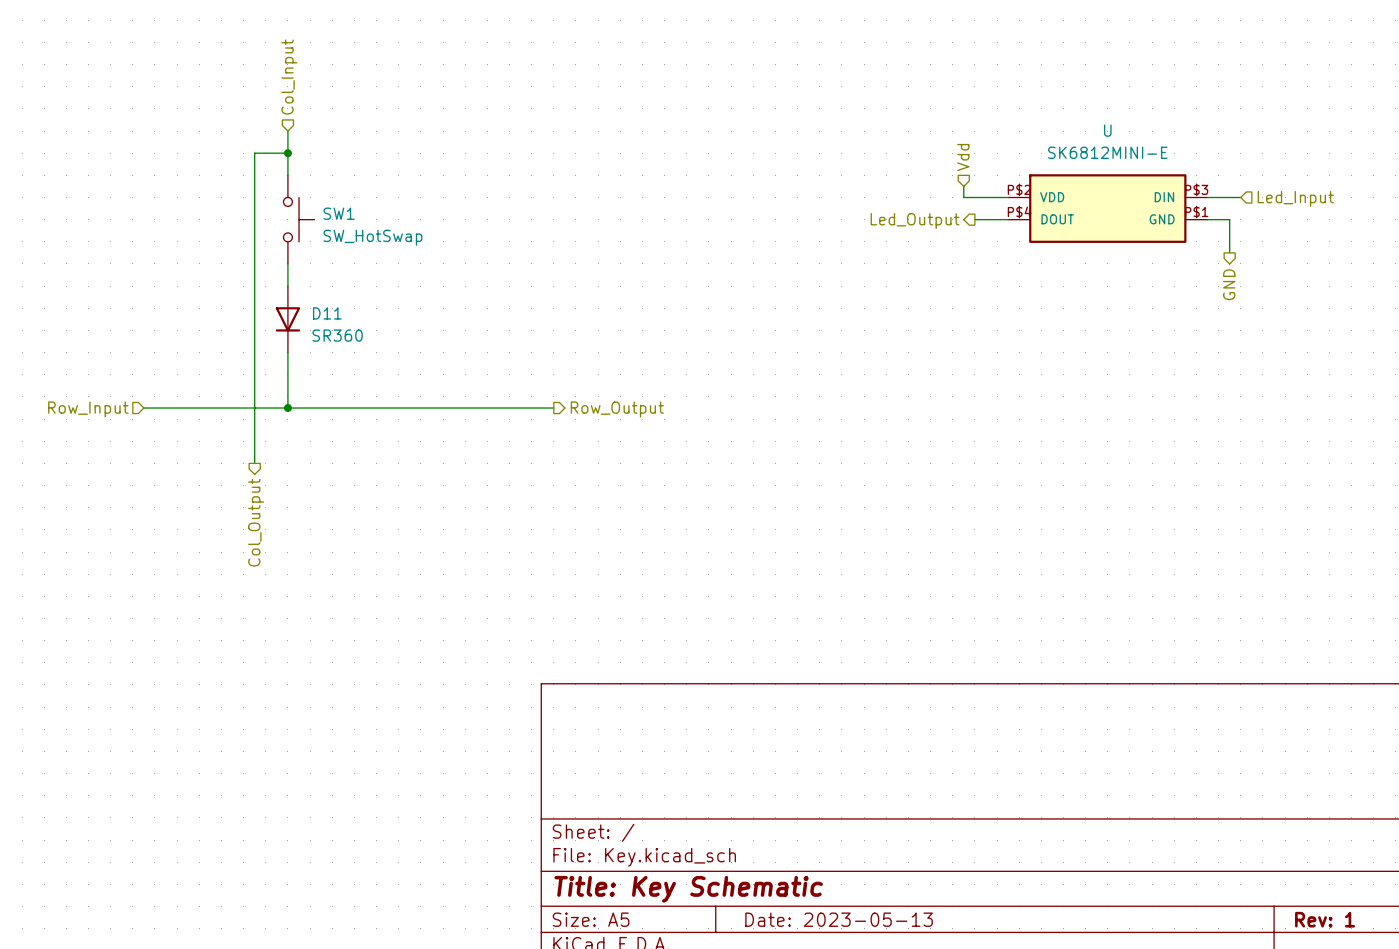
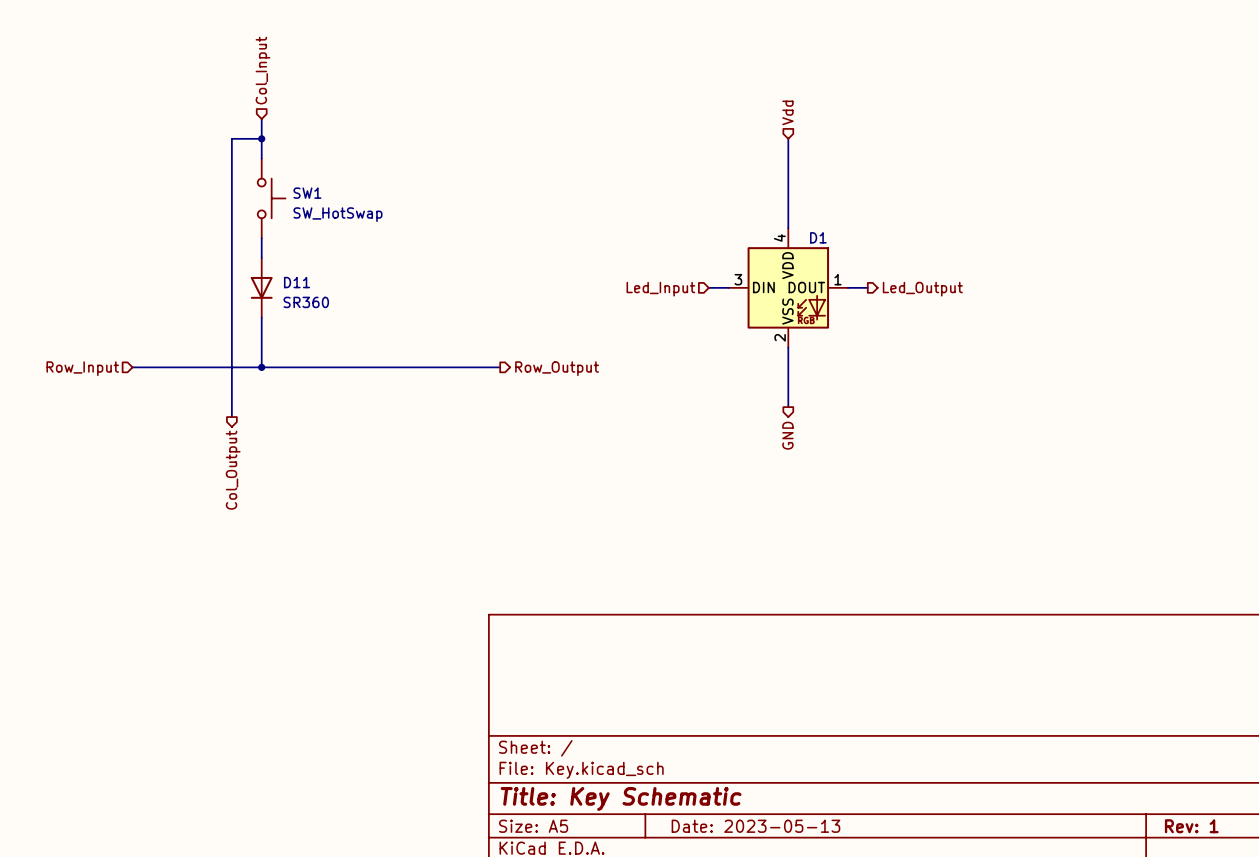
wire: none -> (788, 138) (788, 228)
hierarchical label position: Vdd (963, 157) -> Vdd (787, 112)
wire: (963, 186) (963, 197) (1008, 197) -> none
wire: (1207, 197) (1240, 197) -> none
hierarchical label: Led_Input (1295, 198) -> none
U: SK6812MINI-E (1107, 208) -> none
wire: (974, 219) (1008, 219) -> none
wire: (1207, 219) (1229, 219) (1229, 252) -> none
hierarchical label rotation: 0° (915, 221) -> 180° (922, 289)
hierarchical label position: Led_Output (915, 221) -> Led_Output (922, 289)
hierarchical label: GND (1229, 284) -> none
wire: none -> (708, 287) (728, 287)
D1: none -> (788, 287)
wire: none -> (847, 287) (867, 287)
hierarchical label: none -> Led_Input (660, 289)
wire: none -> (788, 347) (788, 407)
hierarchical label: none -> GND (787, 435)

